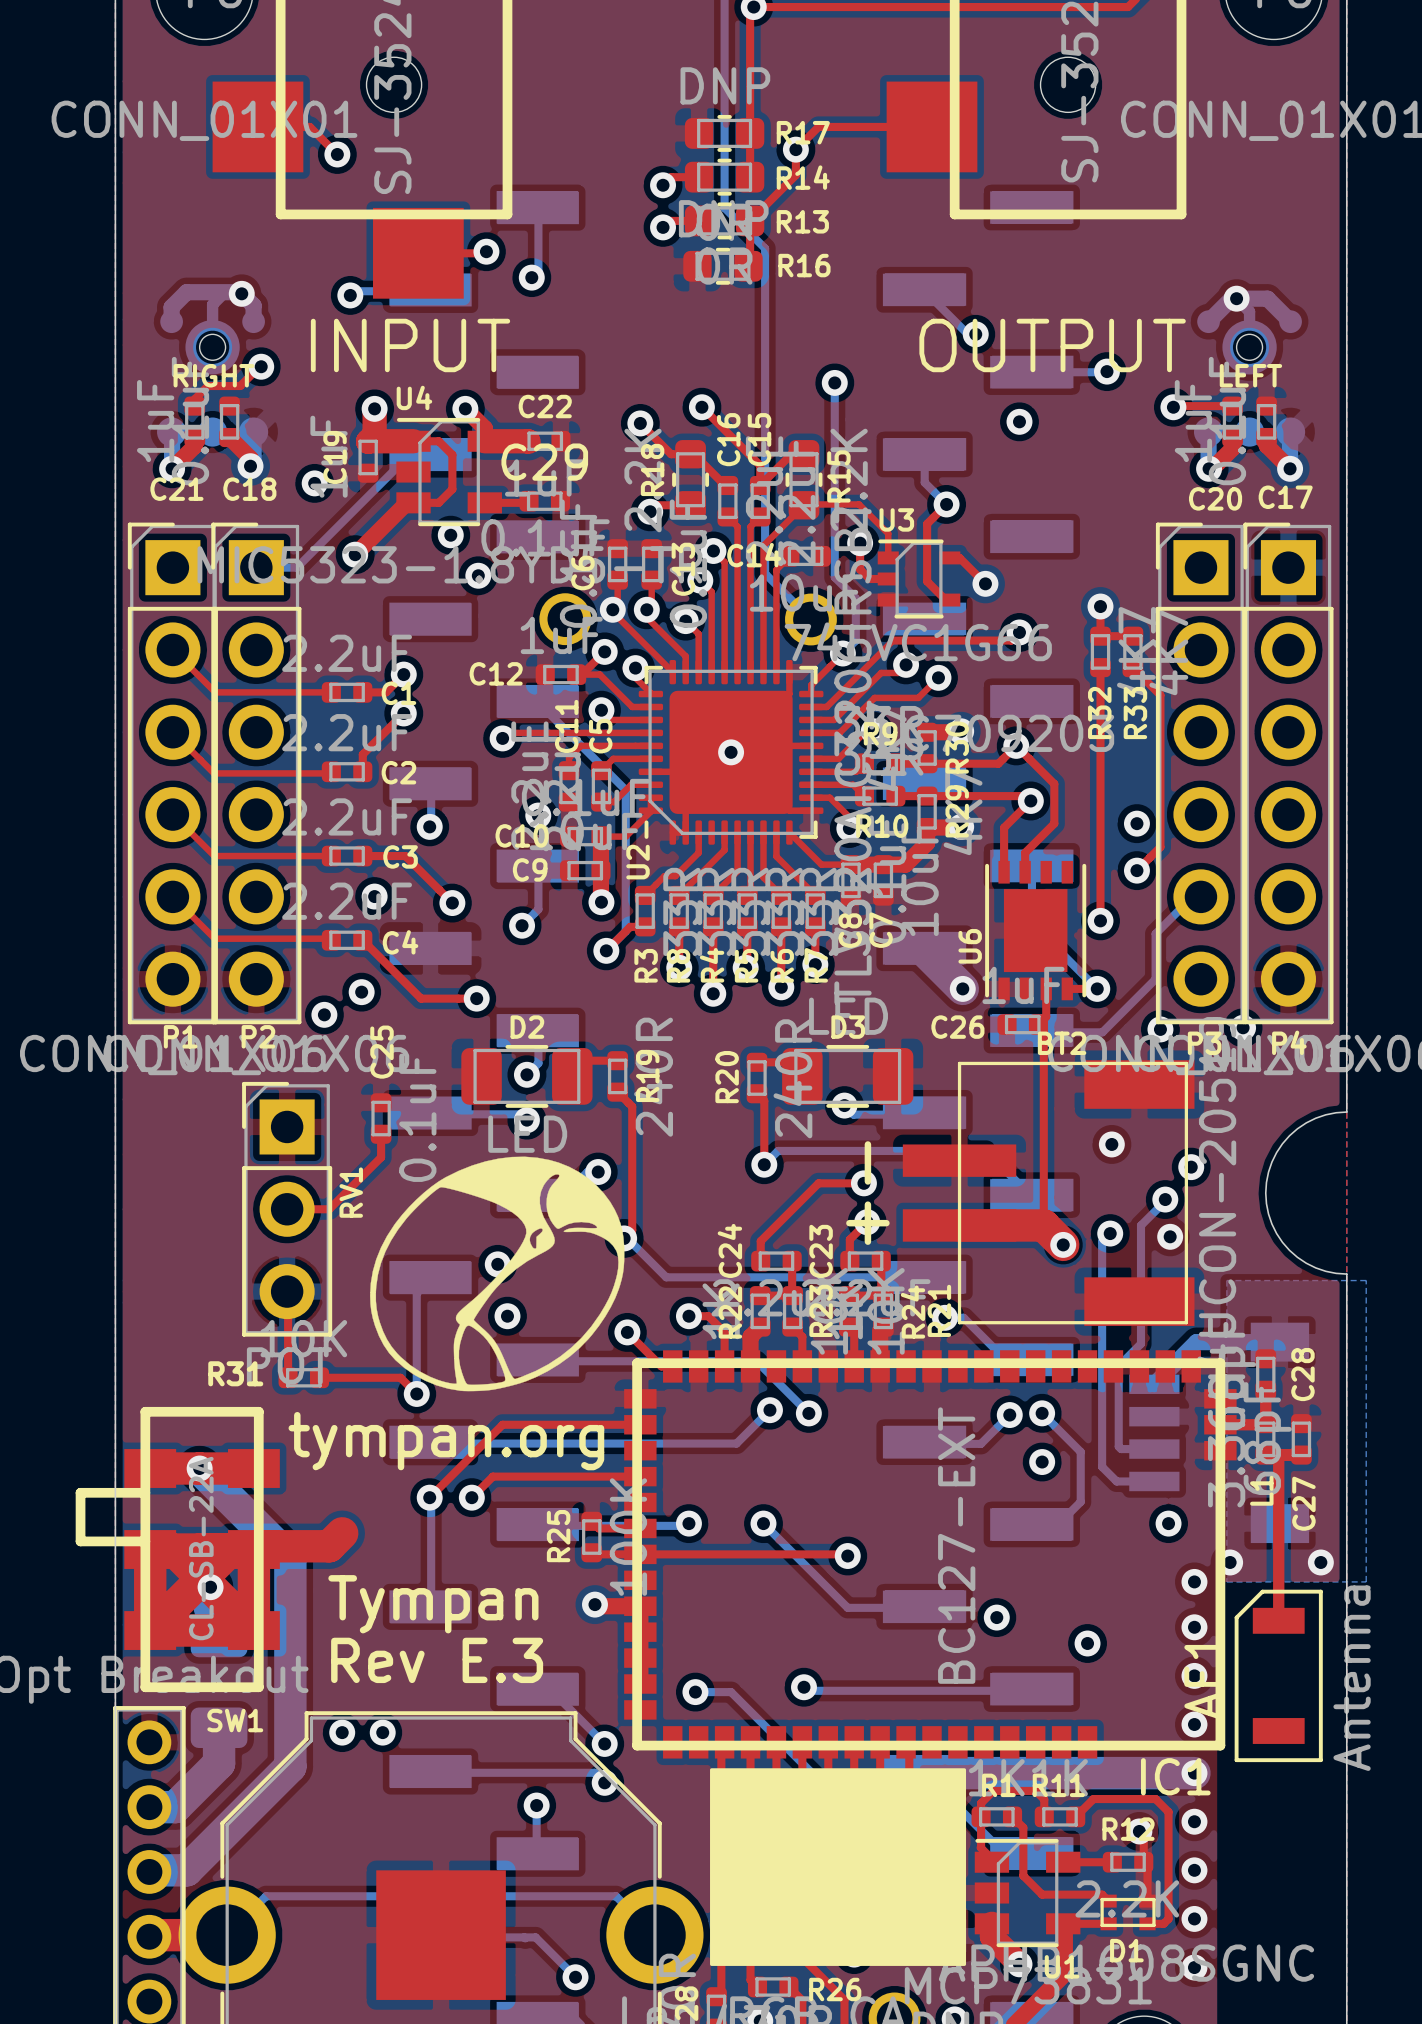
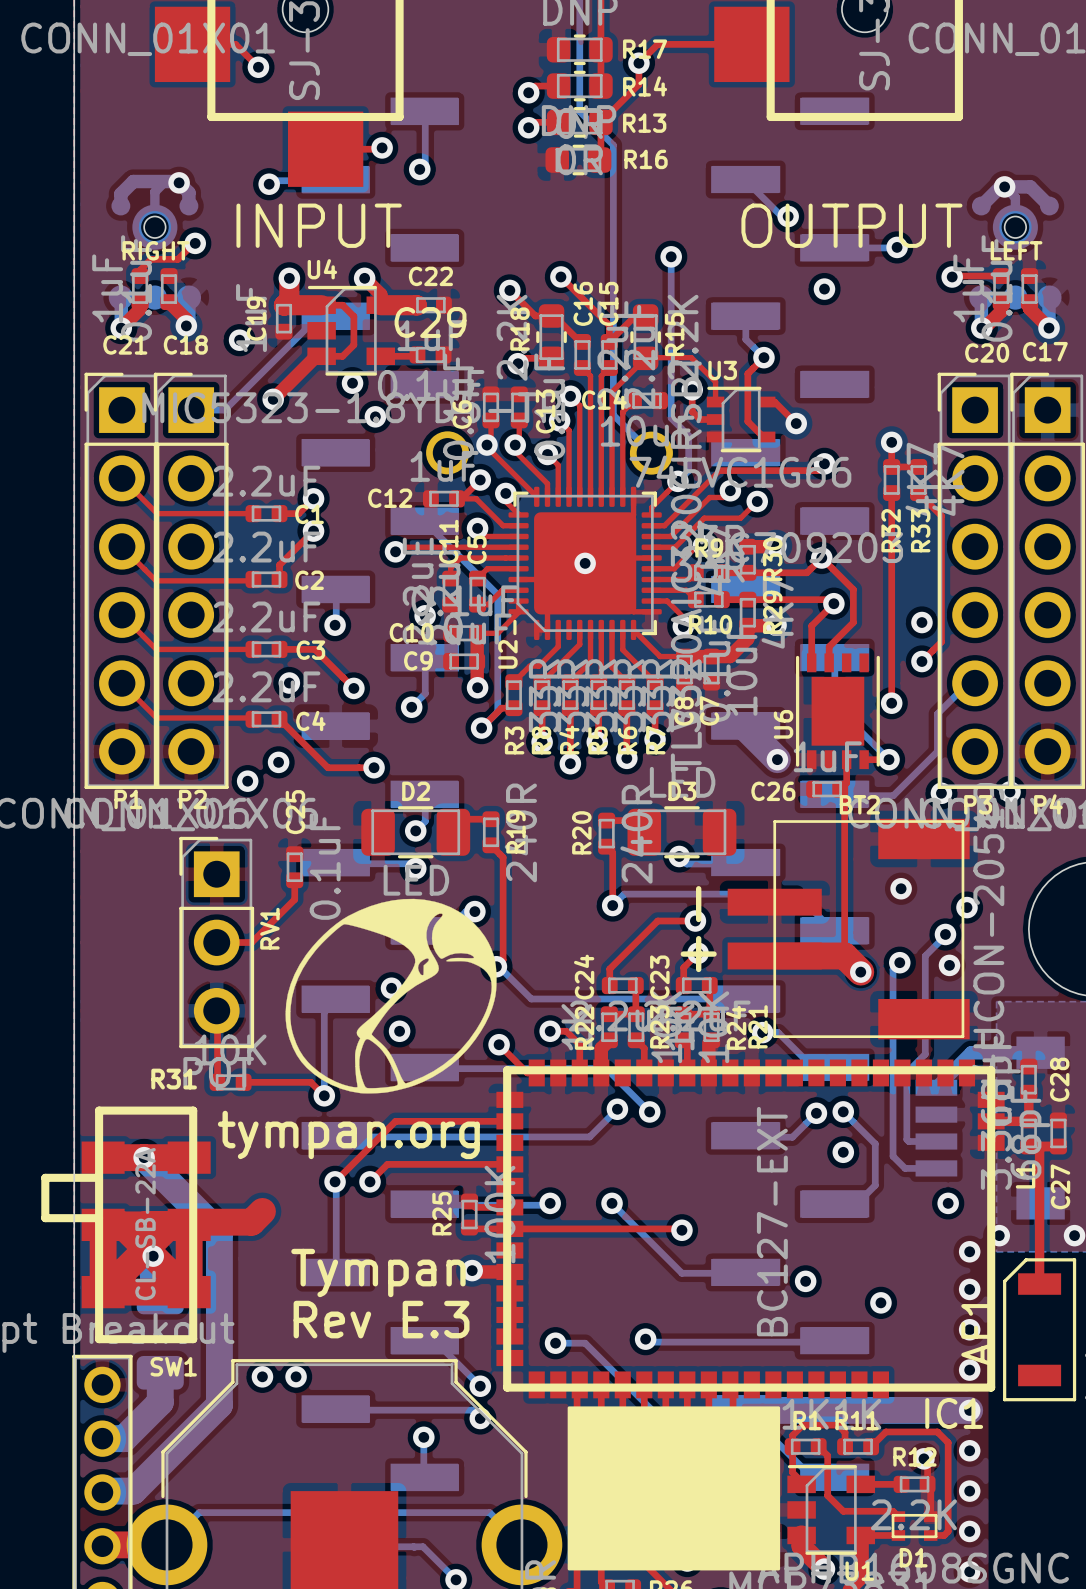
text position: Tympan (433, 1604) -> Tympan (378, 1272)
text position: Rev E.3 (437, 1660) -> Rev E.3 (381, 1319)

